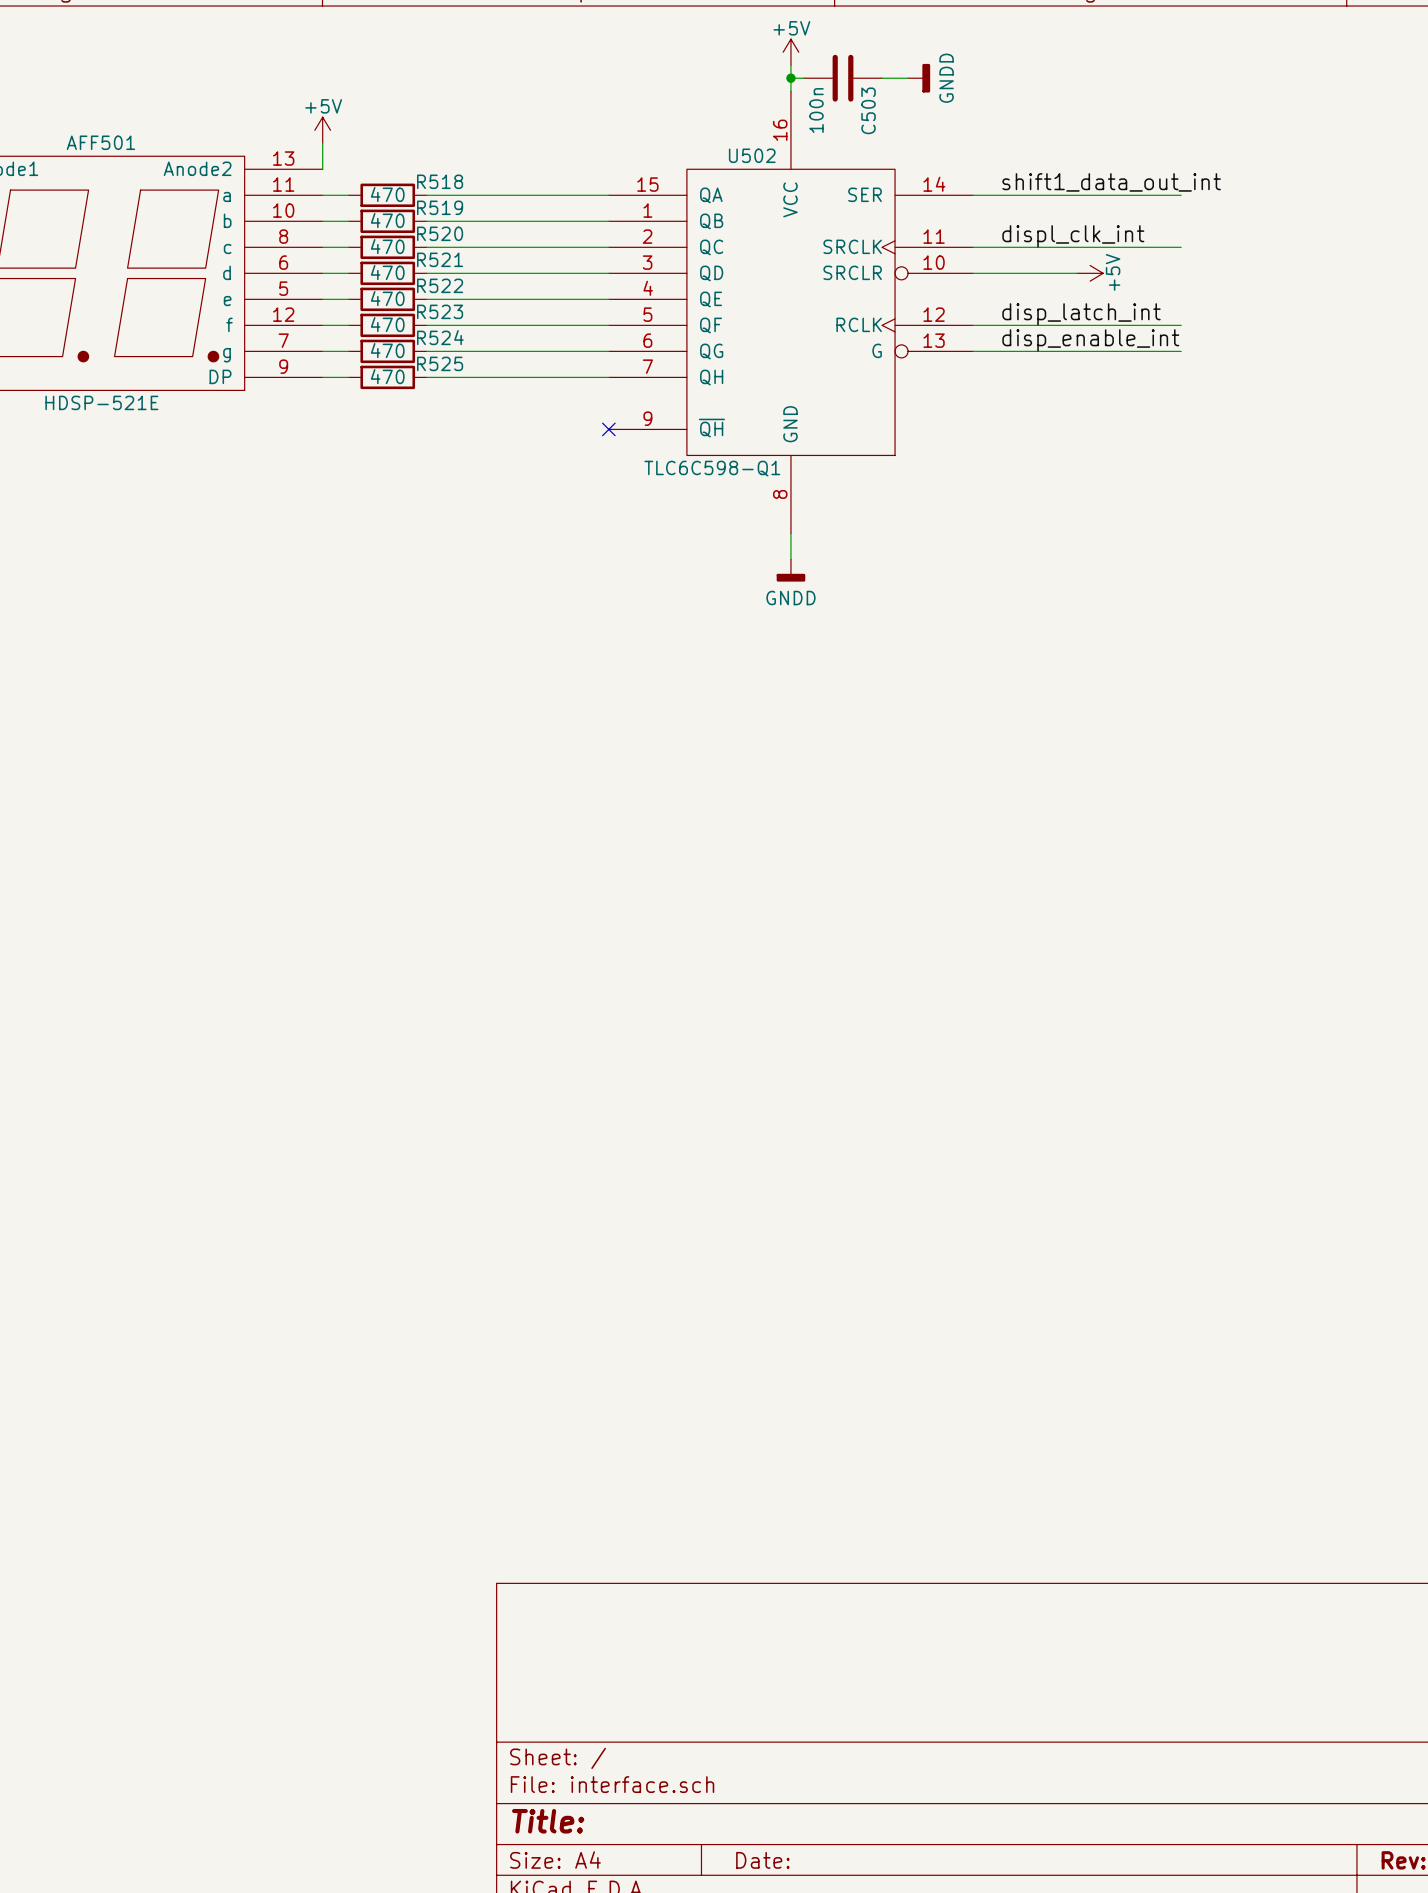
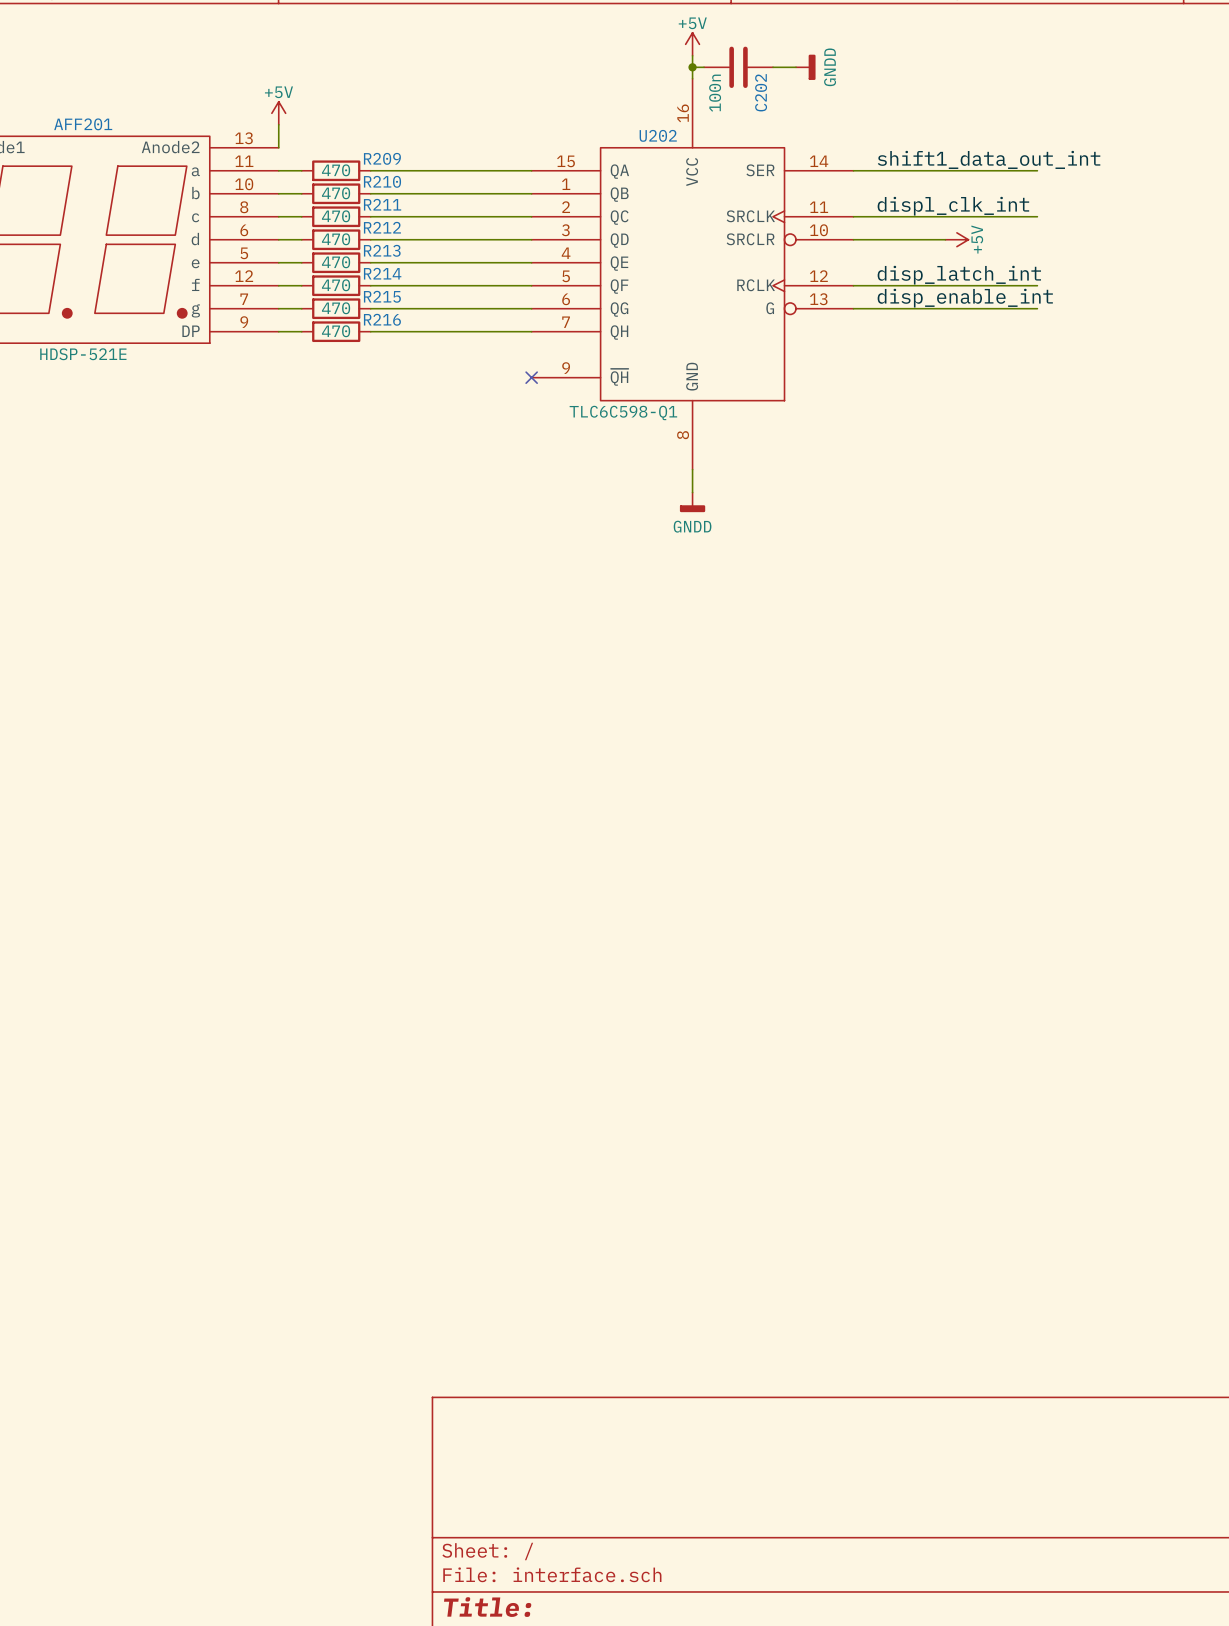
C503 name: C503 (868, 110) -> C202 (761, 92)
AFF501 name: AFF501 (100, 142) -> AFF201 (83, 124)
U502 name: U502 (752, 155) -> U202 (658, 135)
R518 name: R518 (440, 181) -> R209 (382, 158)
R519 name: R519 (440, 207) -> R210 (382, 181)
R520 name: R520 (440, 233) -> R211 (382, 204)
R521 name: R521 (440, 259) -> R212 (382, 227)
R522 name: R522 (440, 285) -> R213 (382, 250)
R523 name: R523 (440, 311) -> R214 (382, 273)
R524 name: R524 (440, 337) -> R215 (382, 296)
R525 name: R525 (440, 363) -> R216 (382, 319)

